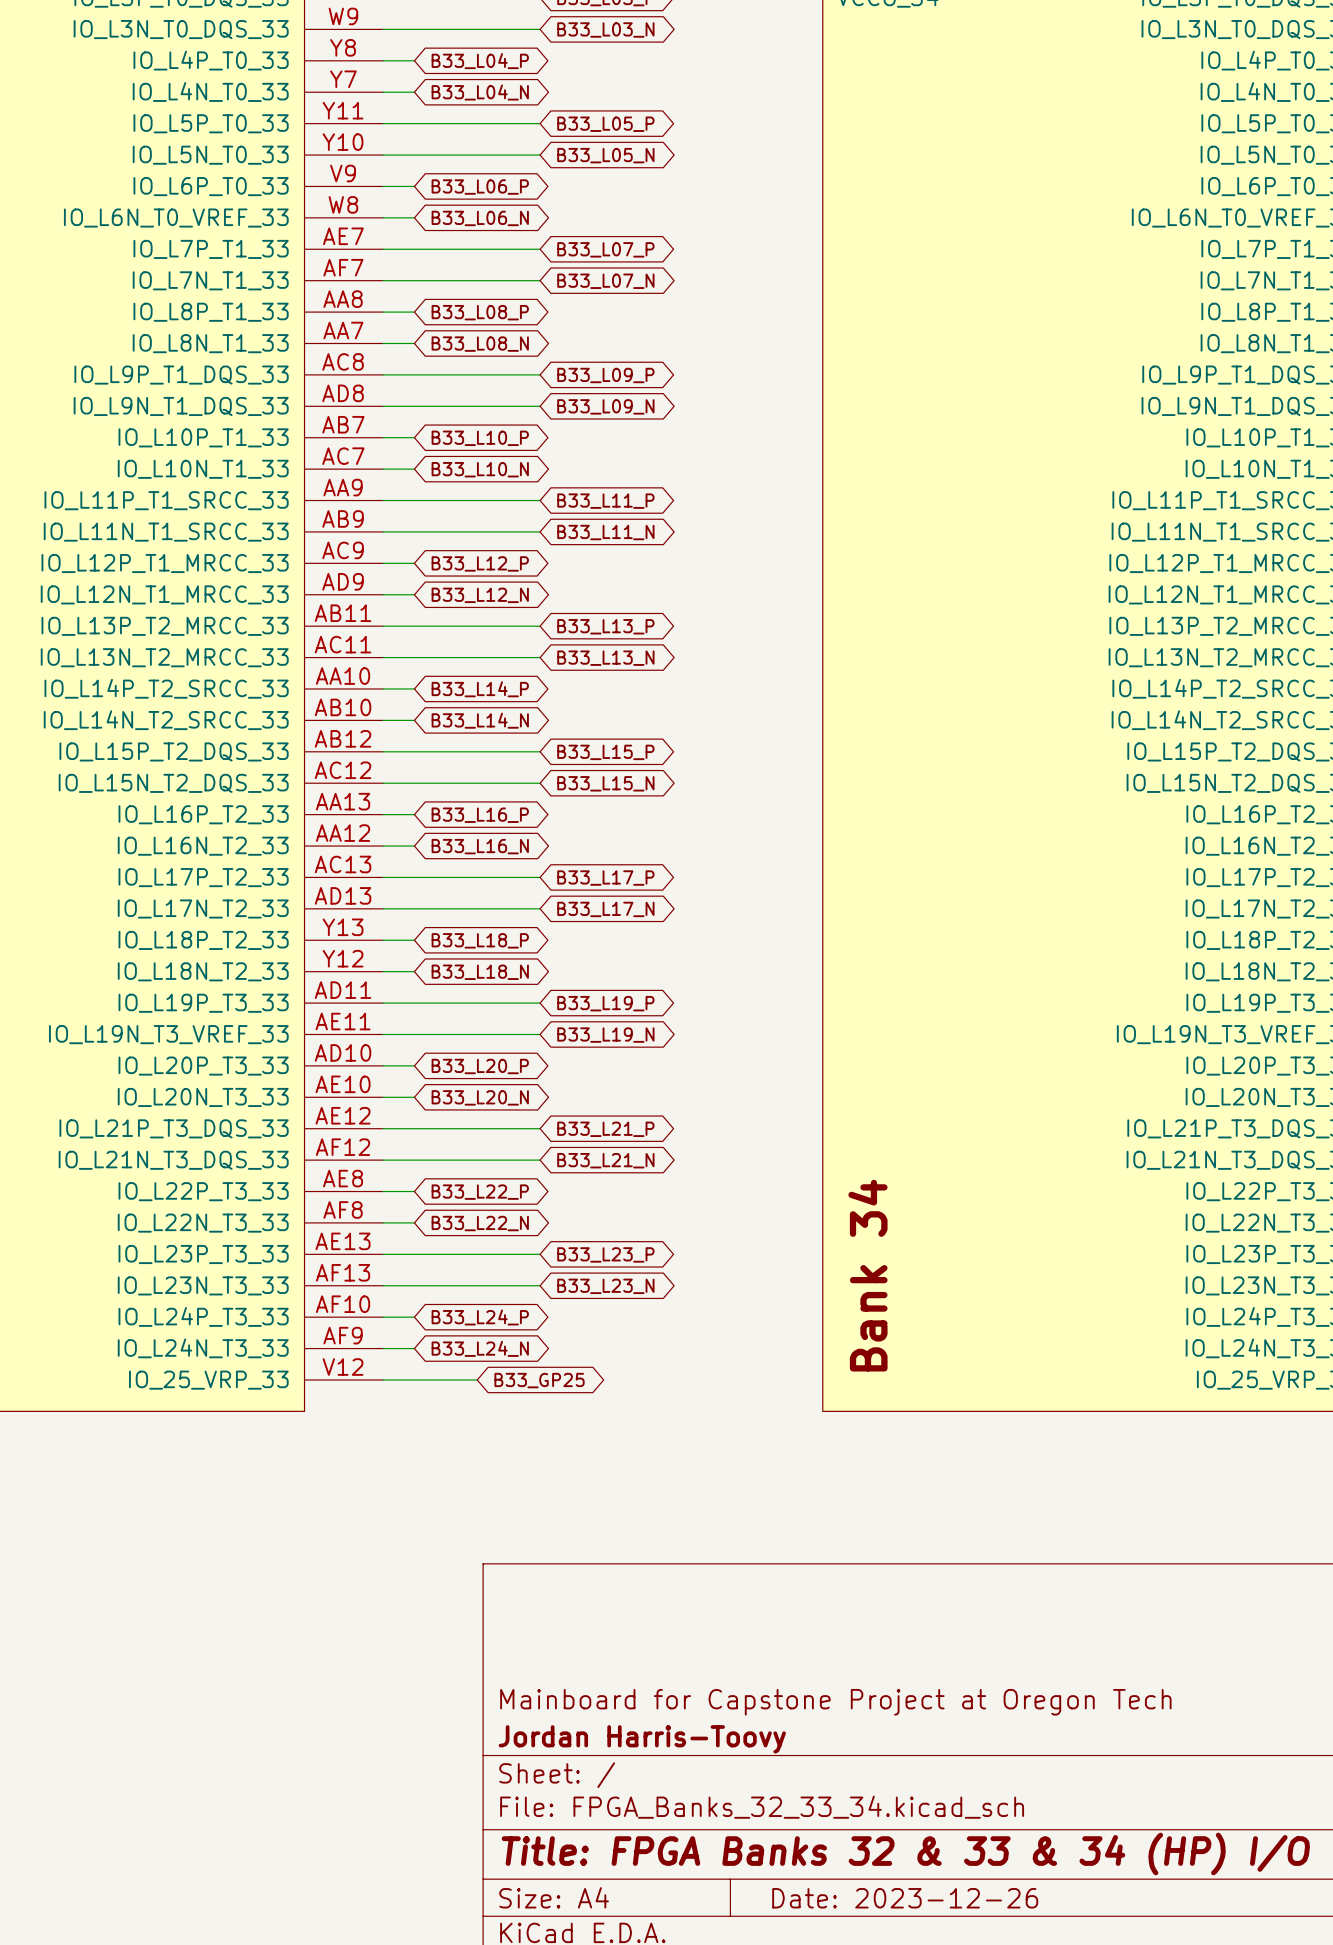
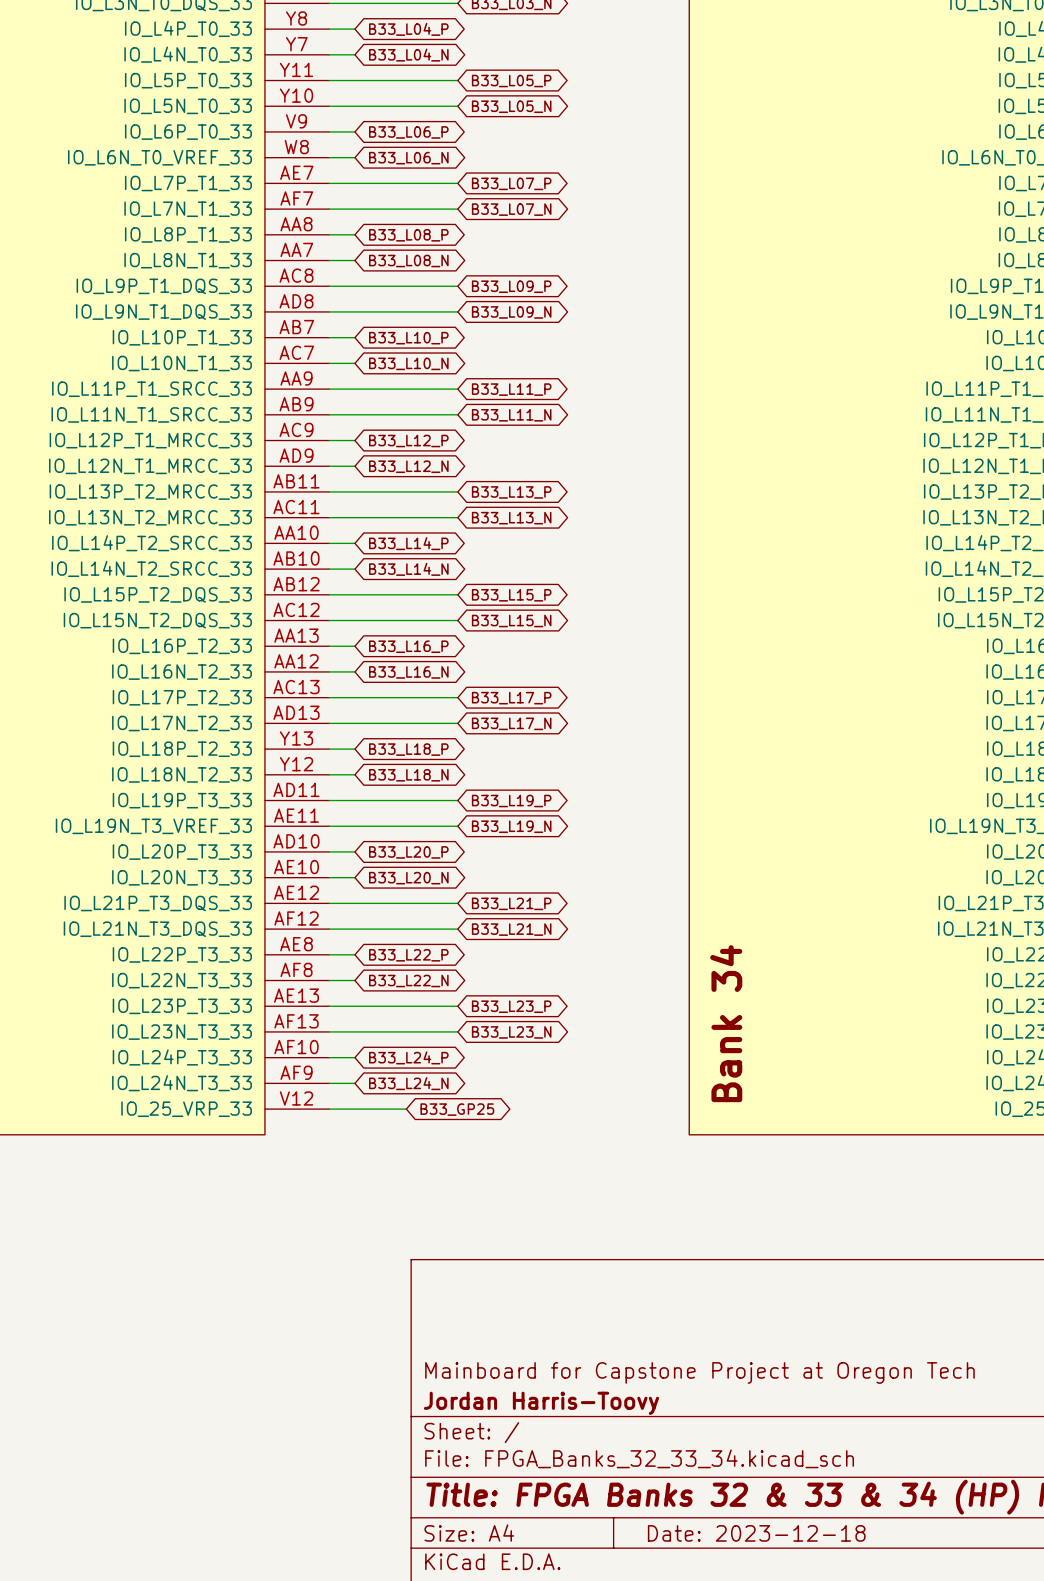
title block: Date: 2023-12-26 (905, 1898) -> Date: 2023-12-18 (756, 1533)

